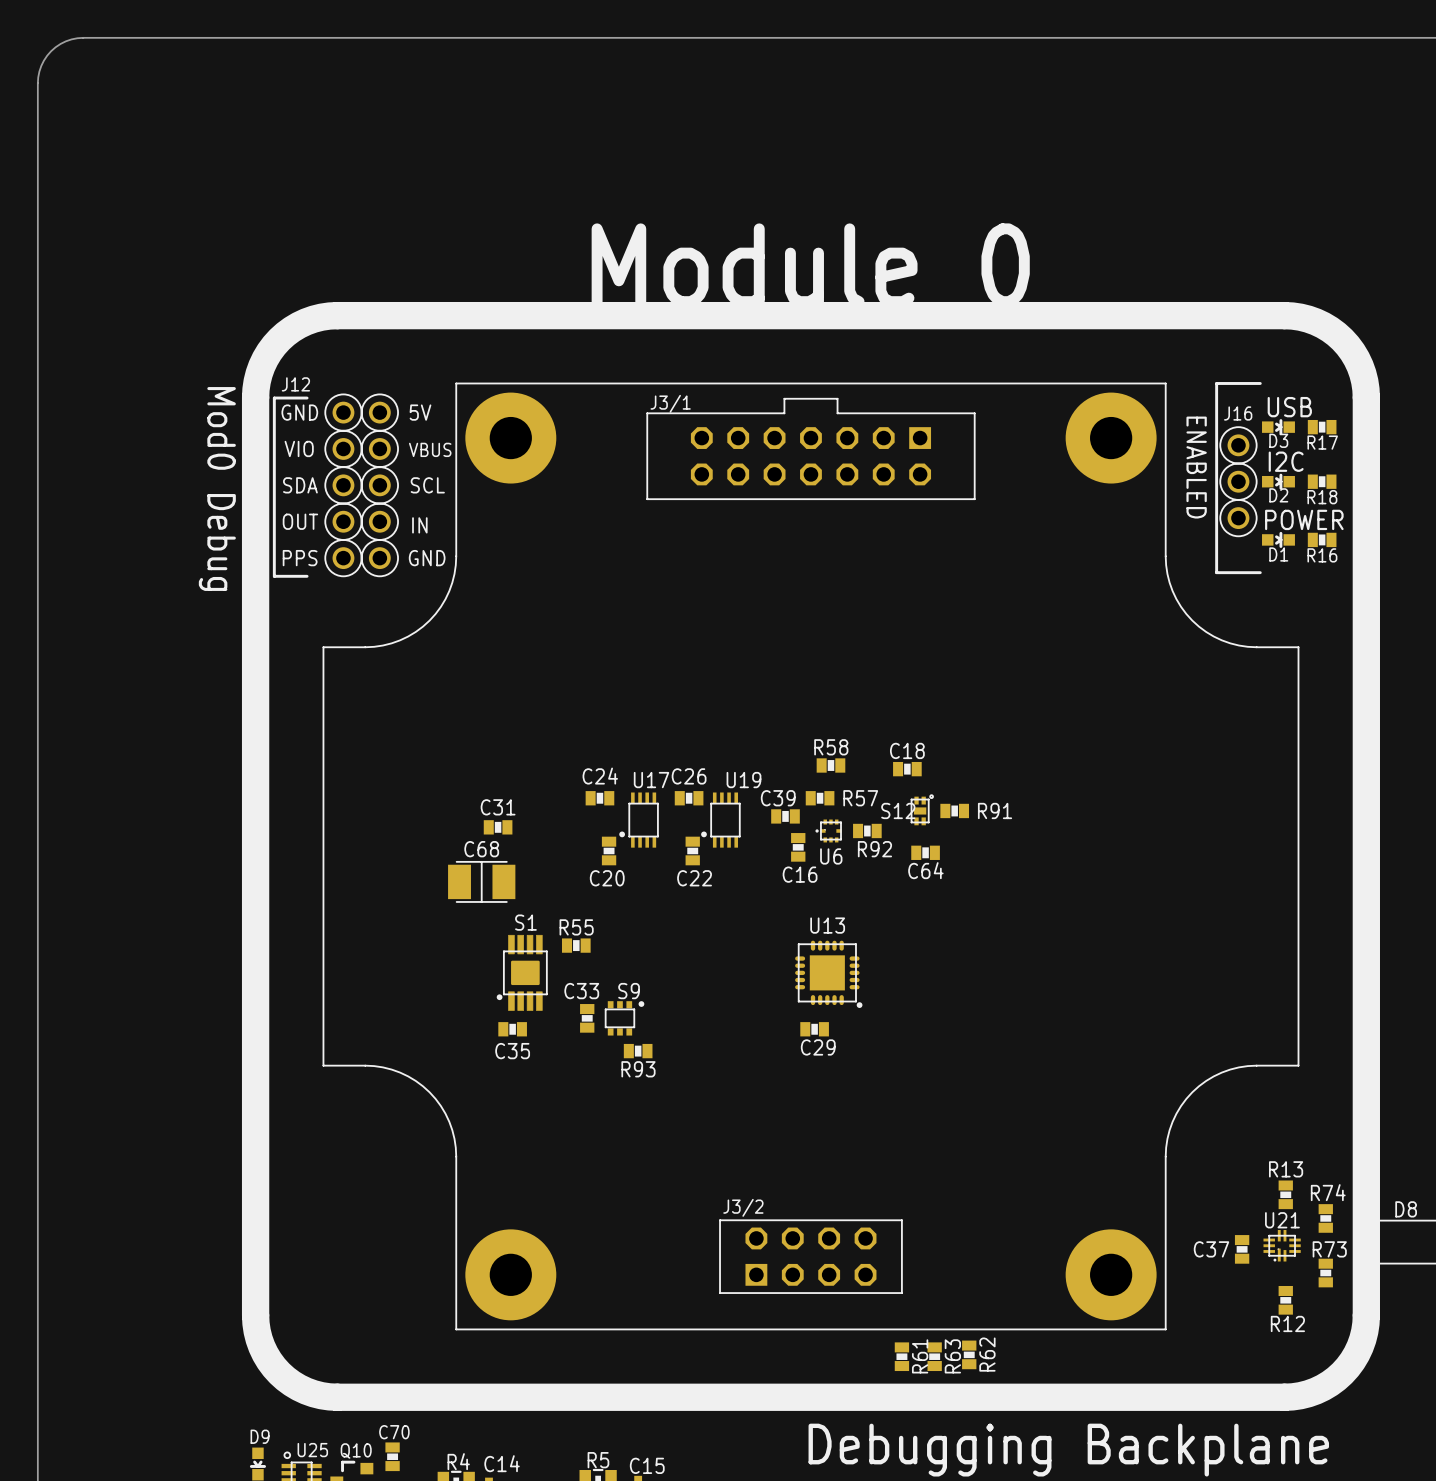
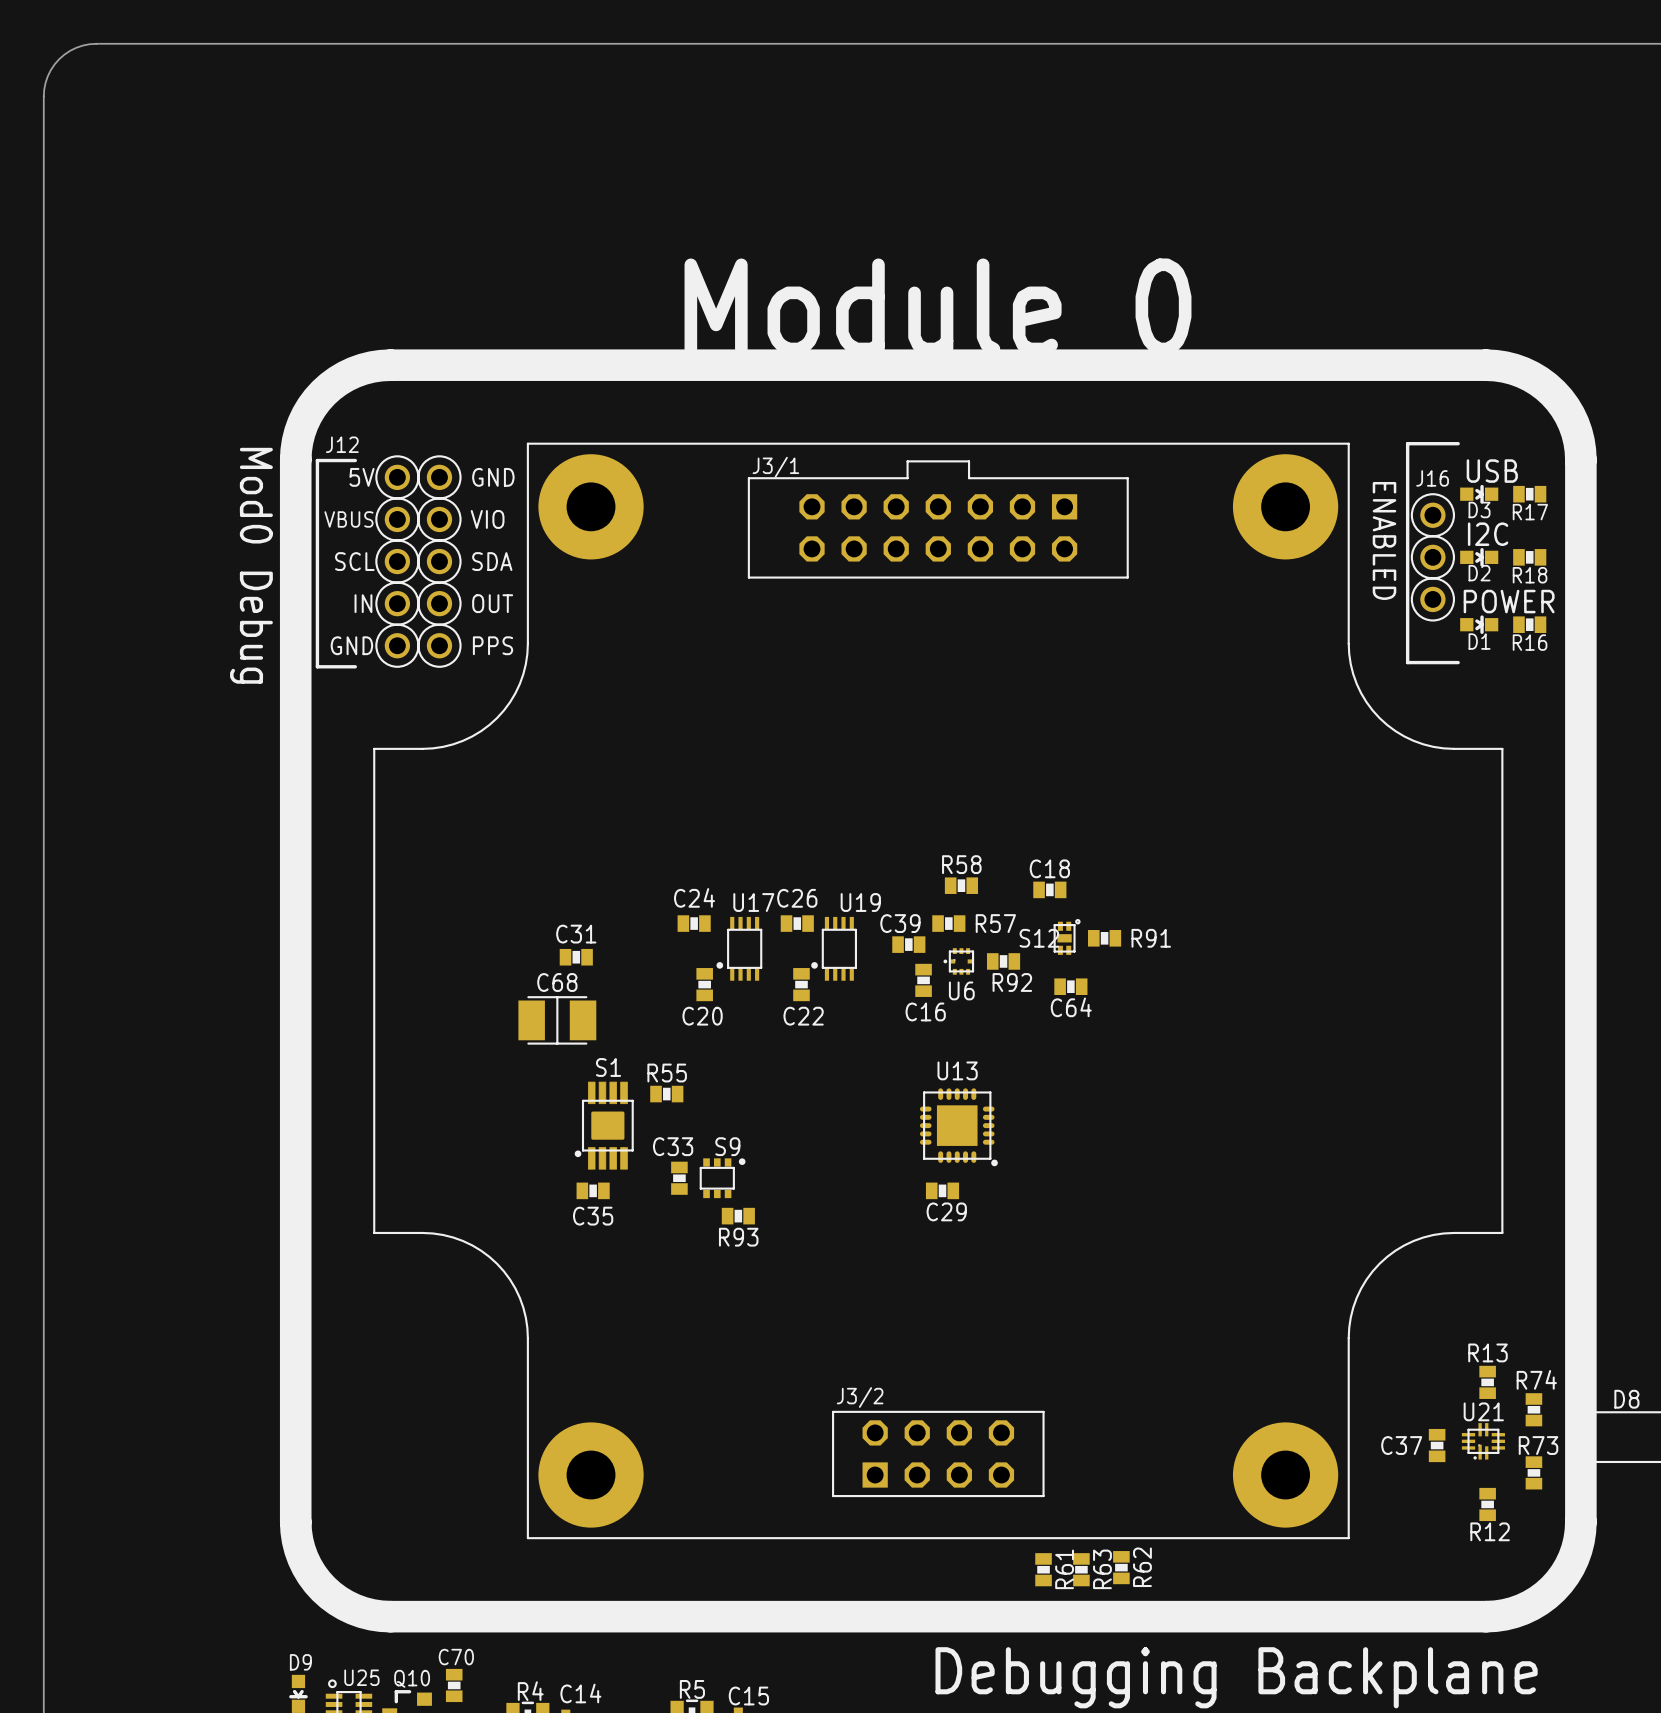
text: GND (299, 412) -> none
text position: 5V (420, 412) -> 5V (362, 477)
text: none -> GND (493, 477)
text position: VIO (299, 448) -> VIO (487, 519)
text position: VBUS (430, 449) -> VBUS (348, 519)
text position: SDA (300, 485) -> SDA (492, 561)
text position: SCL (427, 485) -> SCL (354, 561)
text position: OUT (300, 521) -> OUT (492, 603)
text position: IN (419, 525) -> IN (363, 603)
text position: PPS (300, 558) -> PPS (493, 645)
text: none -> GND (351, 645)
text: GND (427, 558) -> none

